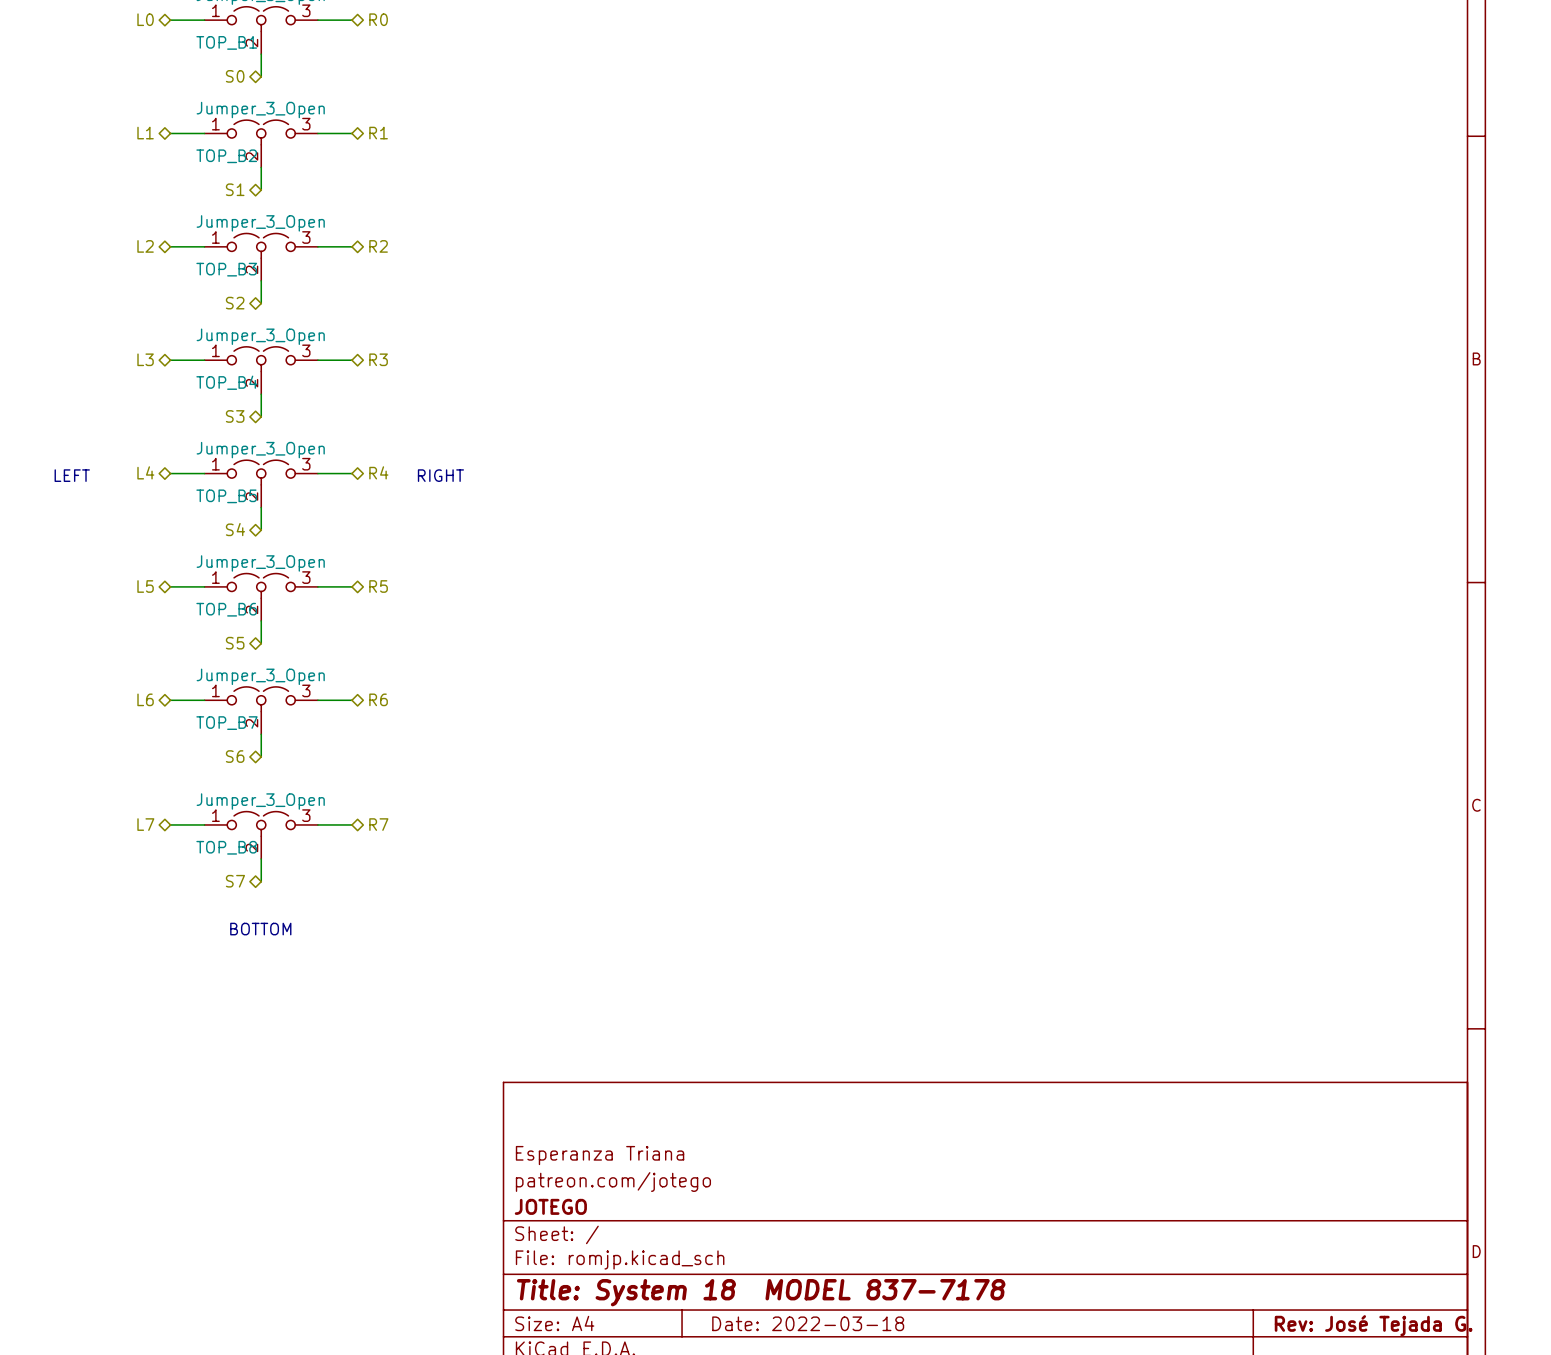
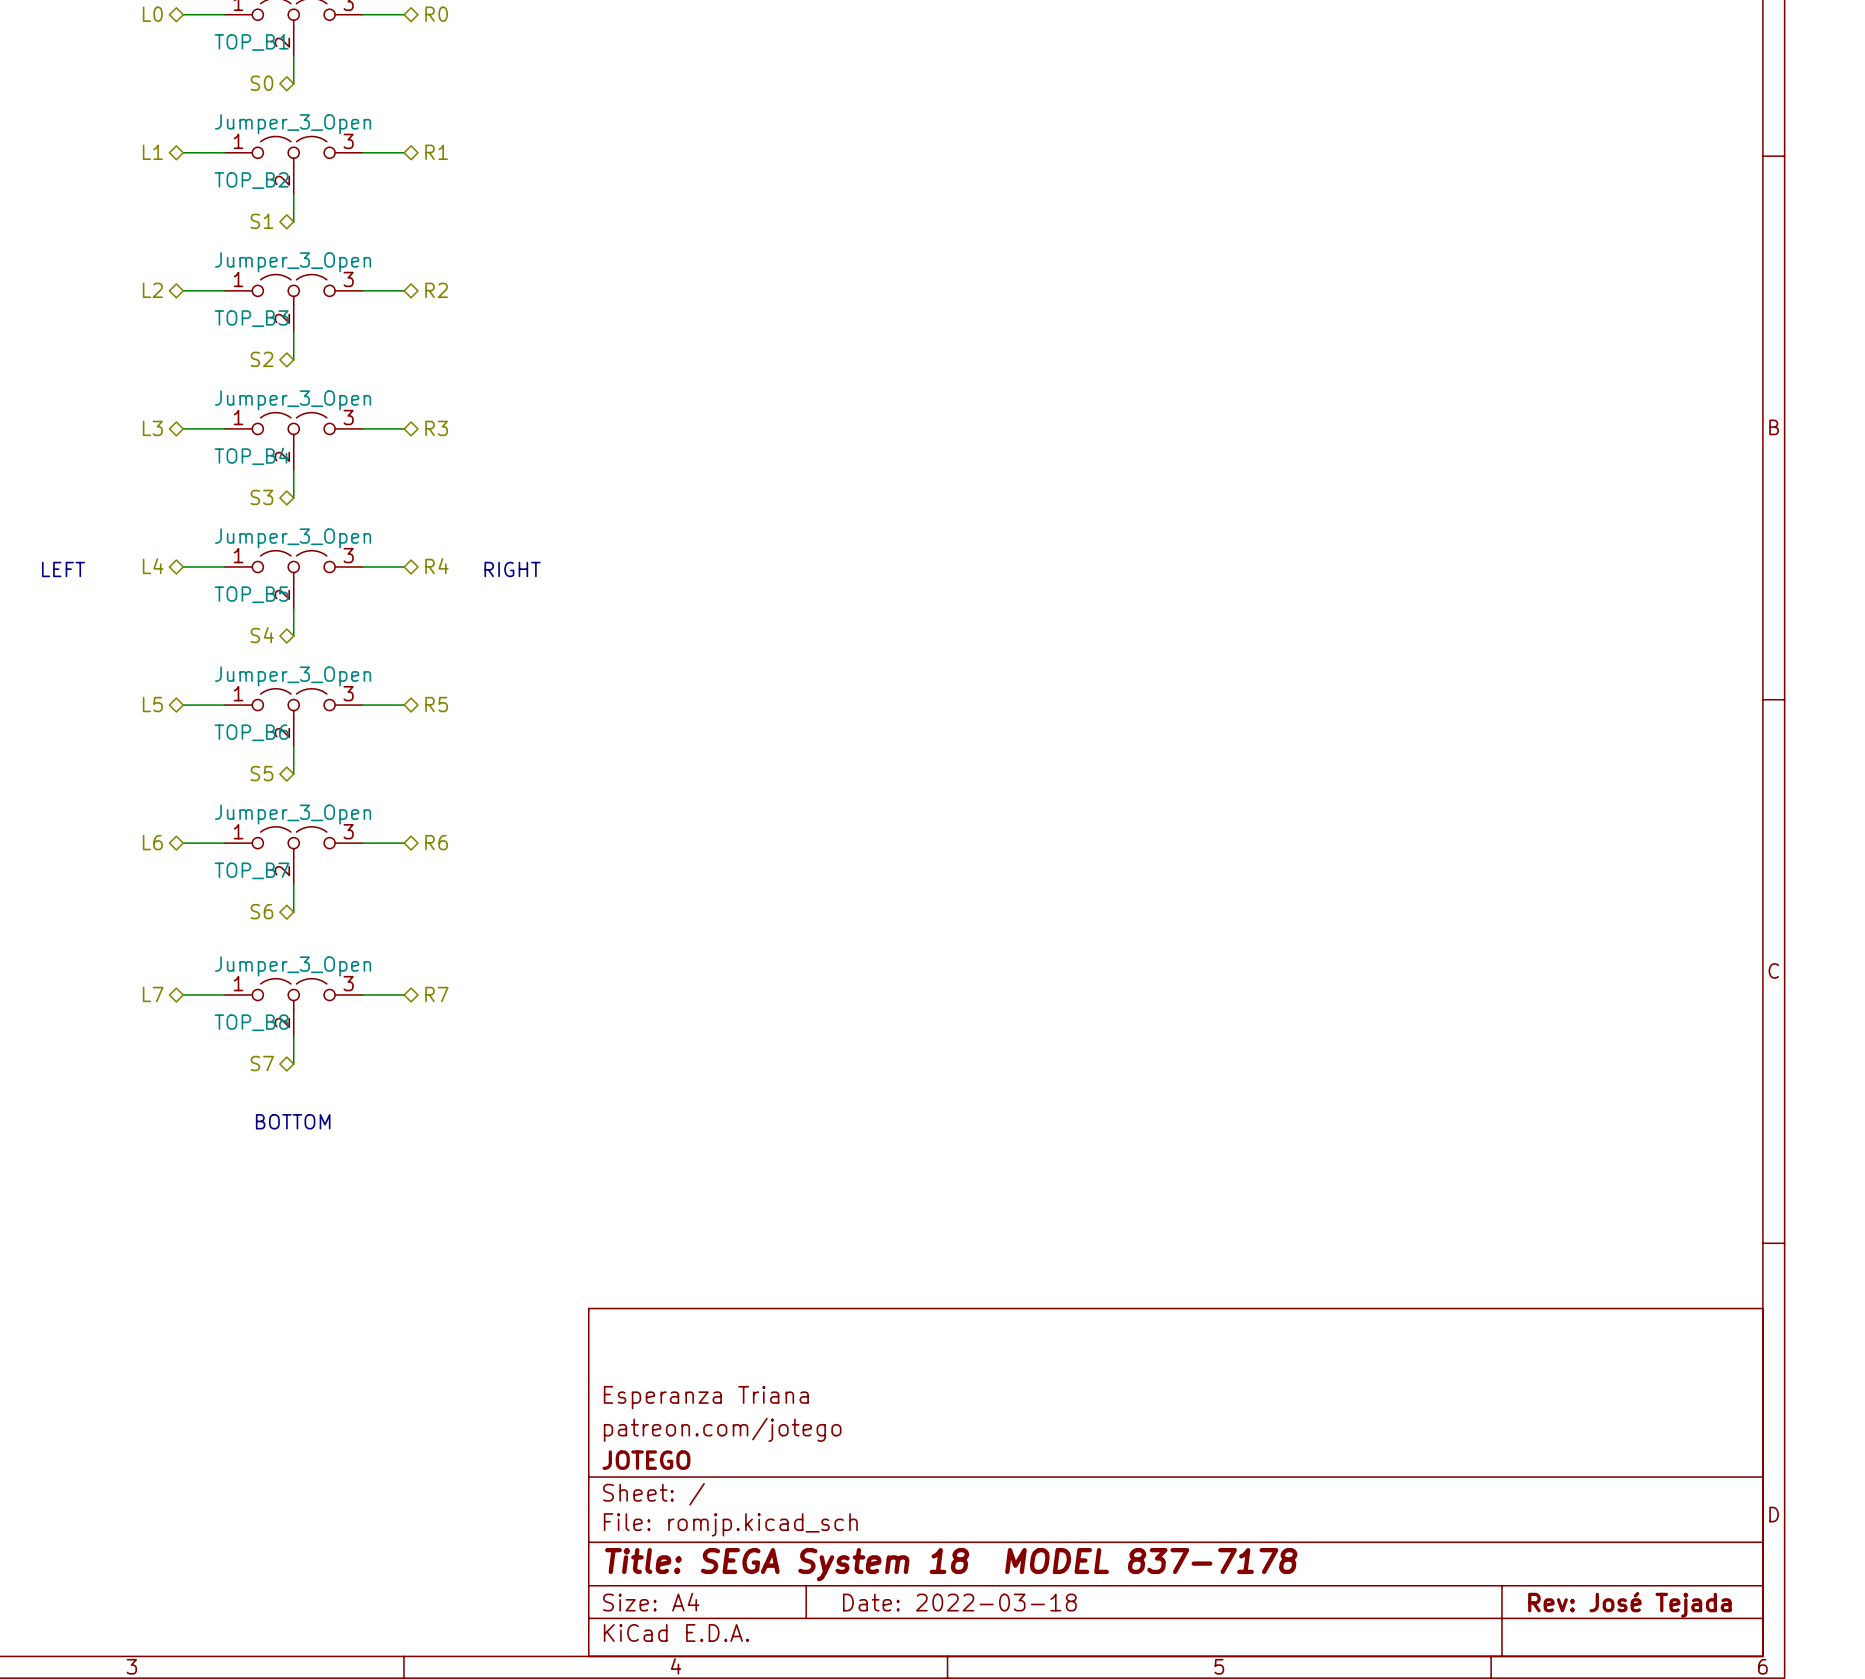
title block: Title: System 18 MODEL 837-7178 (761, 1292) -> Title: SEGA System 18 MODEL 837-7178 (951, 1564)
title block: Rev: José Tejada G. (1373, 1325) -> Rev: José Tejada (1629, 1604)

